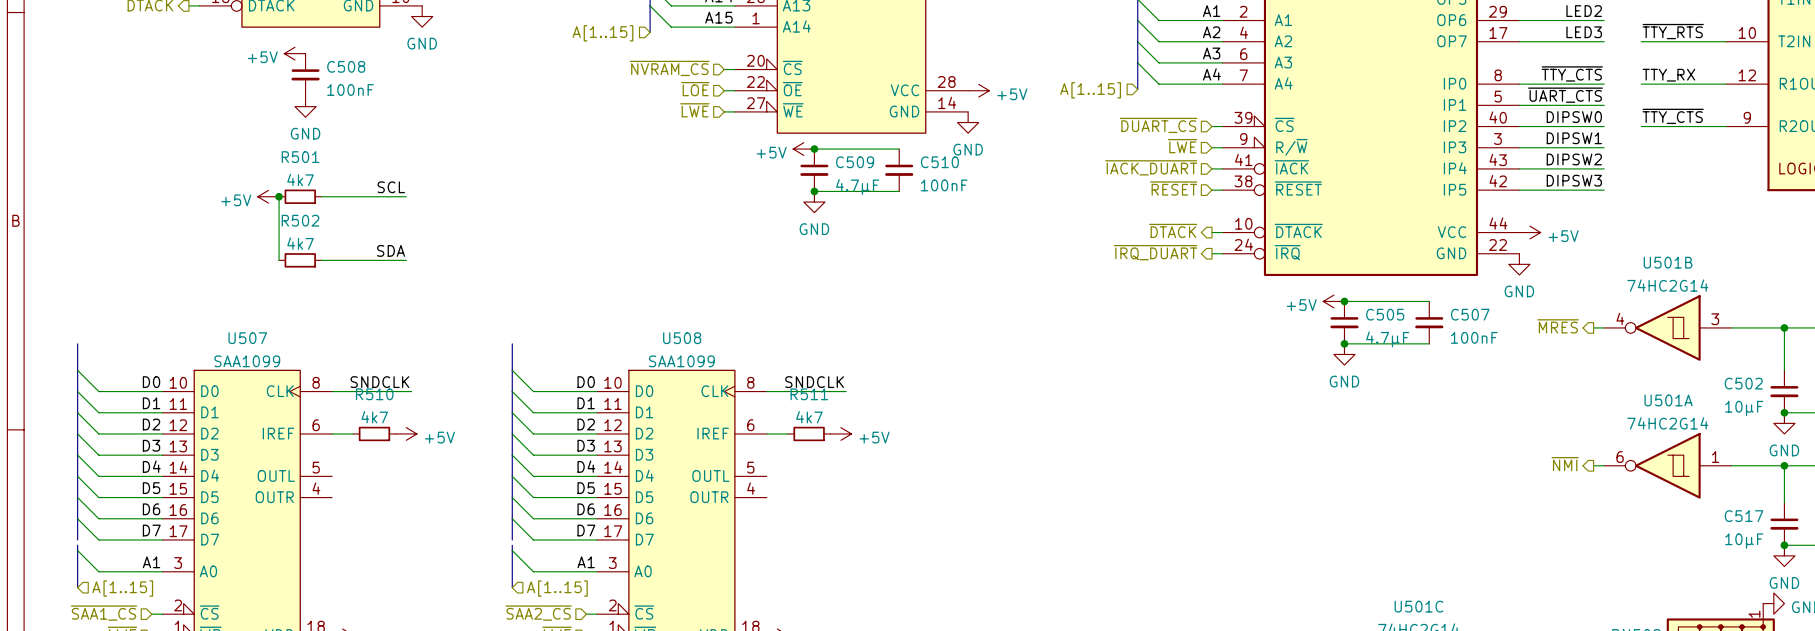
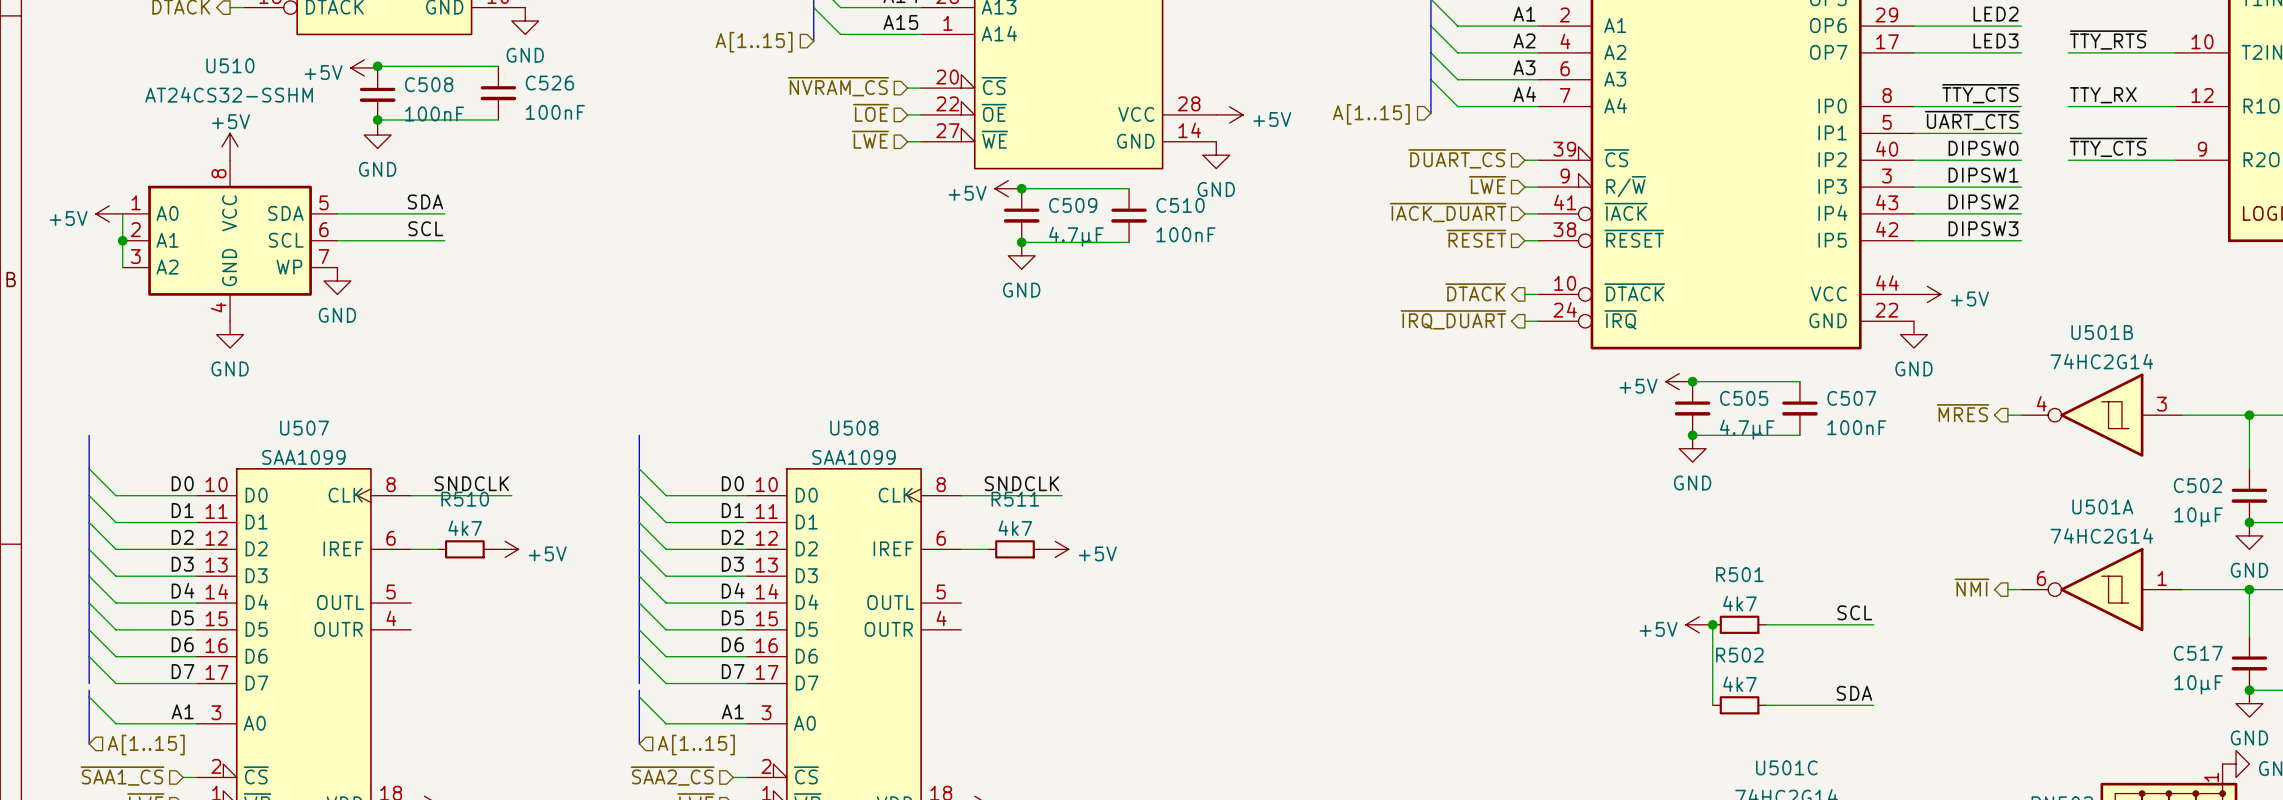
wire: none -> (377, 66) (498, 66)
junction: none -> (377, 66)
C526: none -> 100nF (498, 93)
wire: none -> (377, 119) (498, 119)
junction: none -> (377, 119)
power symbol: none -> +5V (230, 146)
power symbol: none -> +5V (109, 213)
wire: none -> (122, 213) (122, 267)
label position: SCL (391, 187) -> SCL (425, 228)
junction: none -> (122, 240)
U510: none -> AT24CS32-SSHM (230, 240)
power symbol: +5V (268, 196) -> none
wire: (279, 196) (279, 260) -> none
junction: (279, 196) -> none
R501 position: (300, 196) -> (1739, 624)
wire: (321, 196) (406, 196) -> (337, 240) (444, 240)
power symbol: none -> GND (337, 281)
label position: SDA (391, 250) -> SDA (425, 201)
R502 position: (300, 260) -> (1739, 705)
wire: (321, 260) (406, 260) -> (337, 213) (444, 213)
power symbol: none -> GND (230, 334)
label: none -> SCL (1854, 612)
power symbol: none -> +5V (1699, 624)
wire: none -> (1712, 624) (1712, 705)
junction: none -> (1712, 624)
wire: none -> (1766, 624) (1873, 624)
label: none -> SDA (1854, 693)
wire: none -> (1766, 705) (1873, 705)

